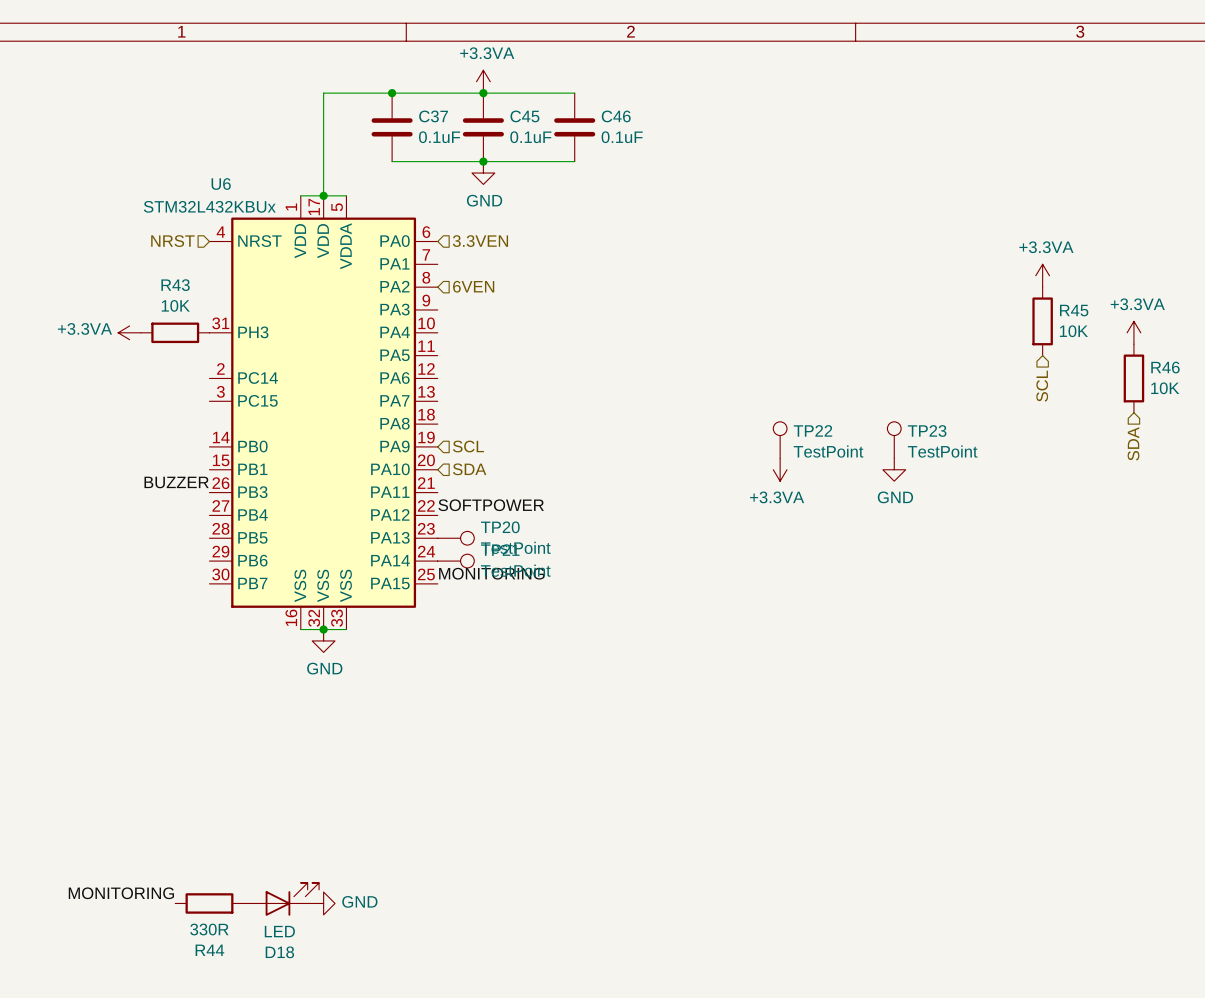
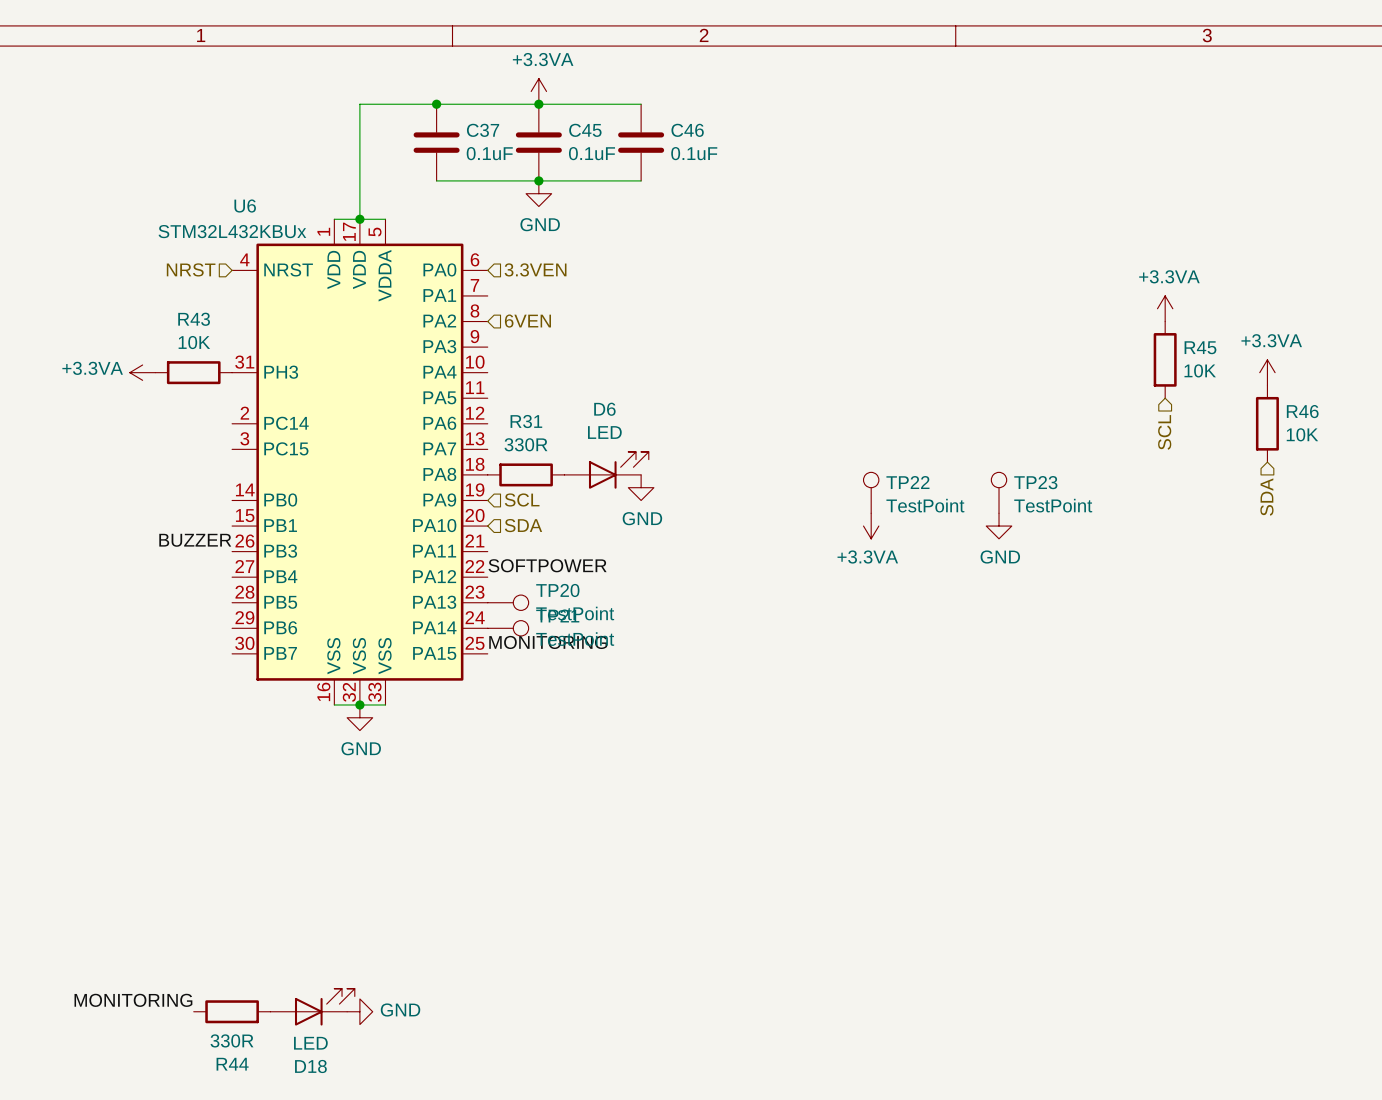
D6: none -> LED (606, 470)
R31: none -> 330R (526, 474)
power symbol: none -> GND (641, 487)

